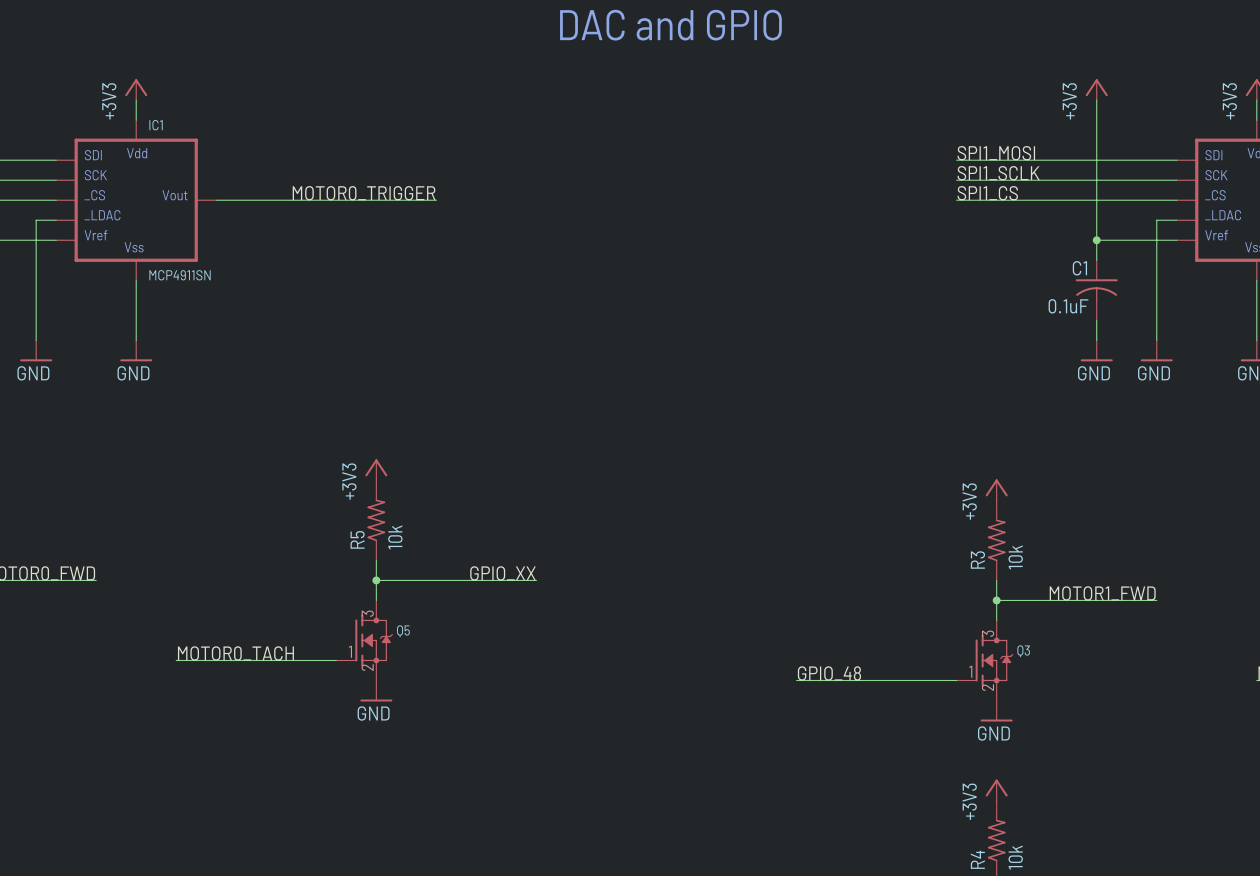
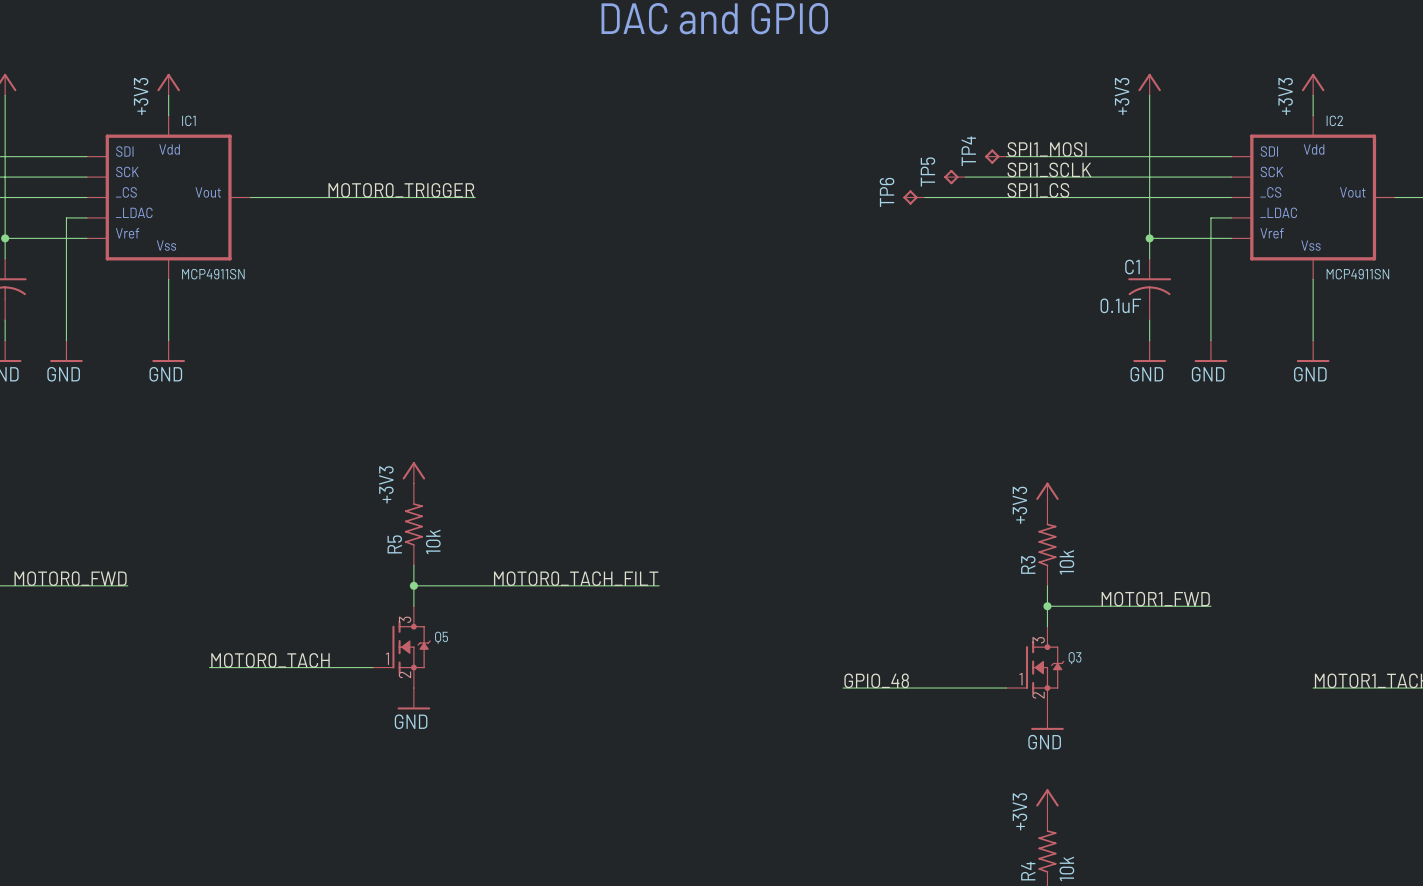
TP4: none -> (995, 156)
TP5: none -> (954, 177)
wire: none -> (965, 177) (1006, 177)
TP6: none -> (914, 197)
wire: none -> (924, 197) (1006, 197)
label: GPIO_XX (502, 573) -> none
label: none -> MOTOR0_TACH_FILT (576, 578)
wire: none -> (577, 585) (659, 585)

